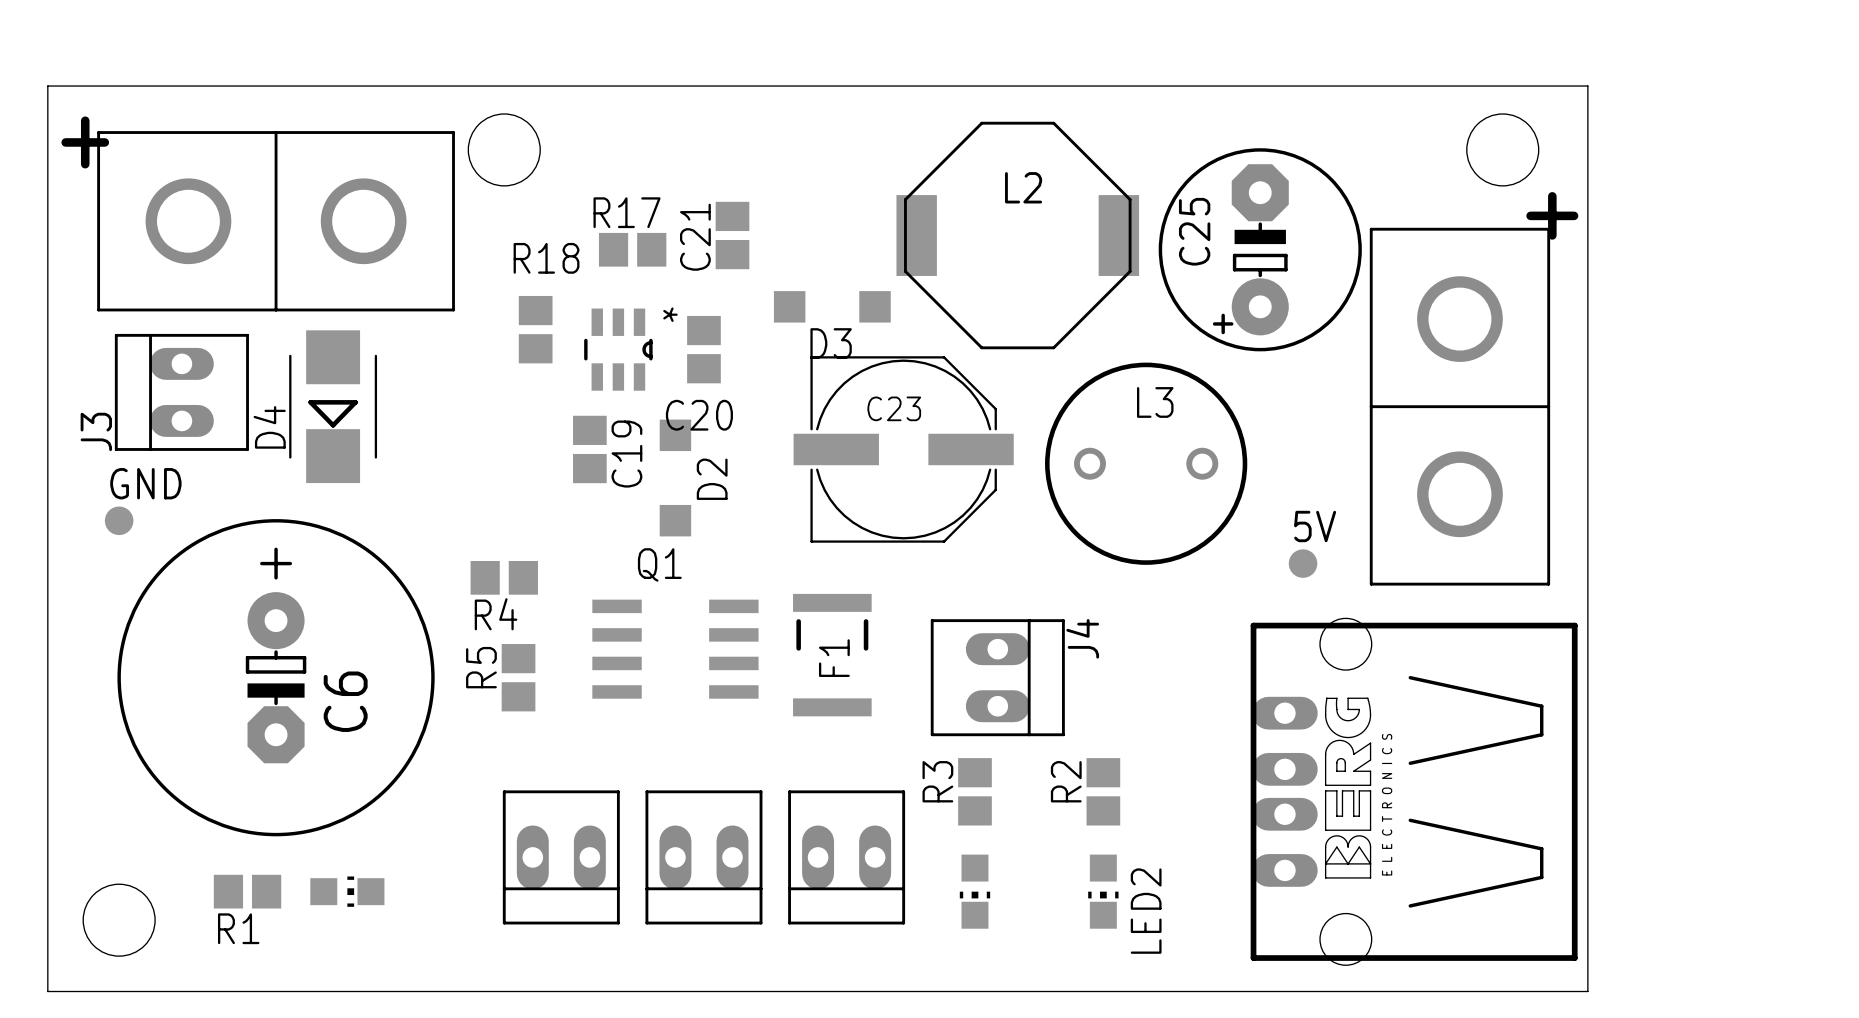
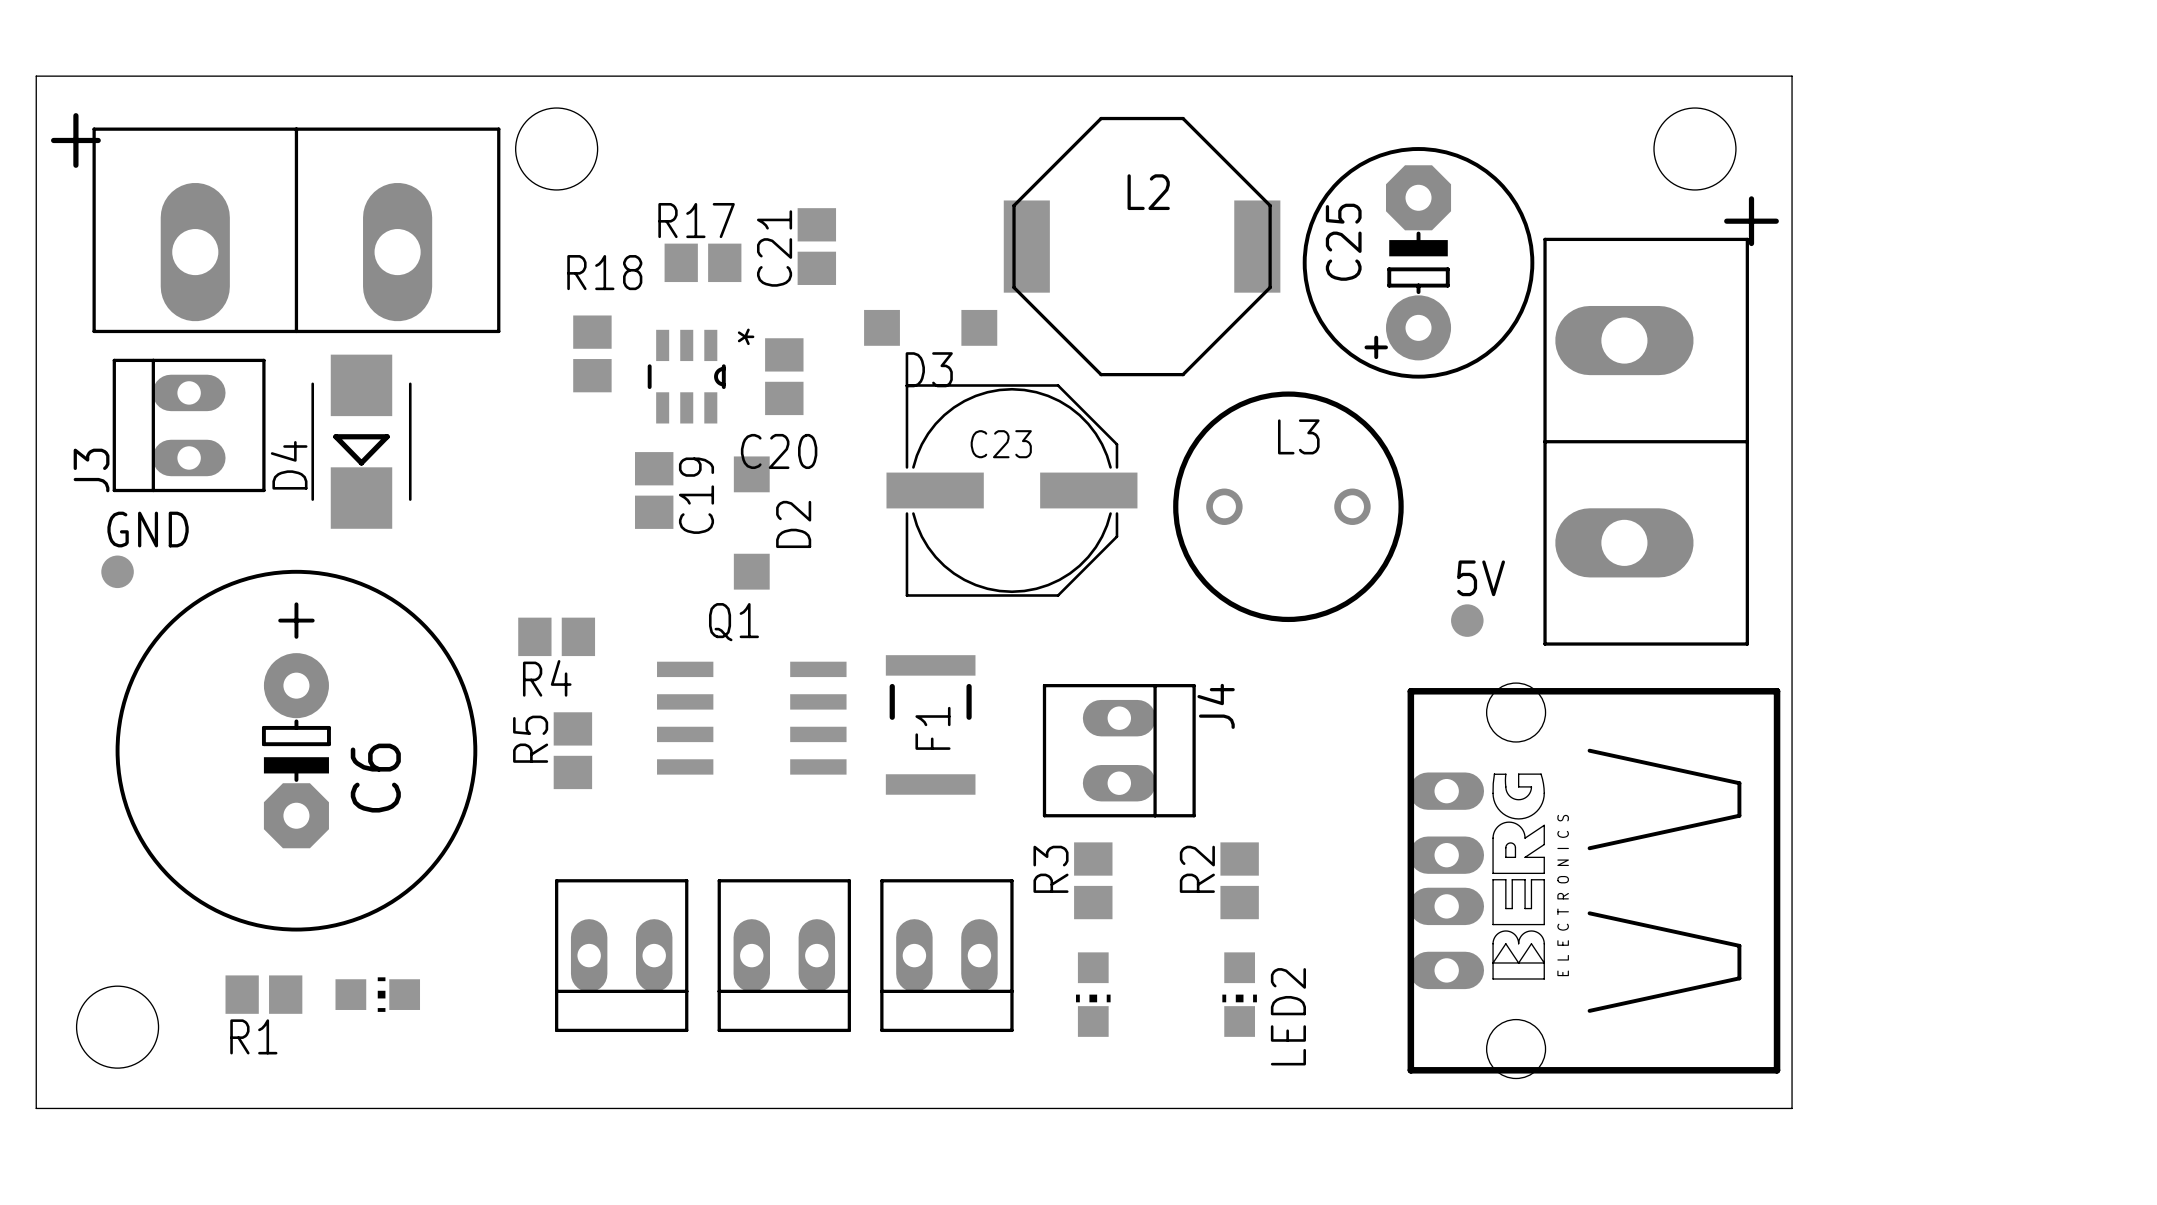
part footprint: [97, 131, 455, 312] -> [92, 127, 501, 334]
part footprint: [1369, 227, 1551, 586] -> [1543, 237, 1749, 646]

